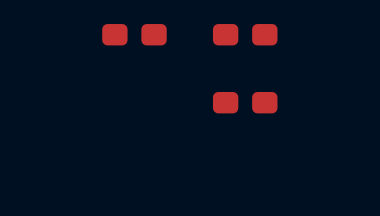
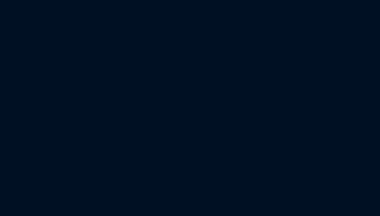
part: (134, 34) -> none
part: (245, 34) -> none
part: (245, 102) -> none

